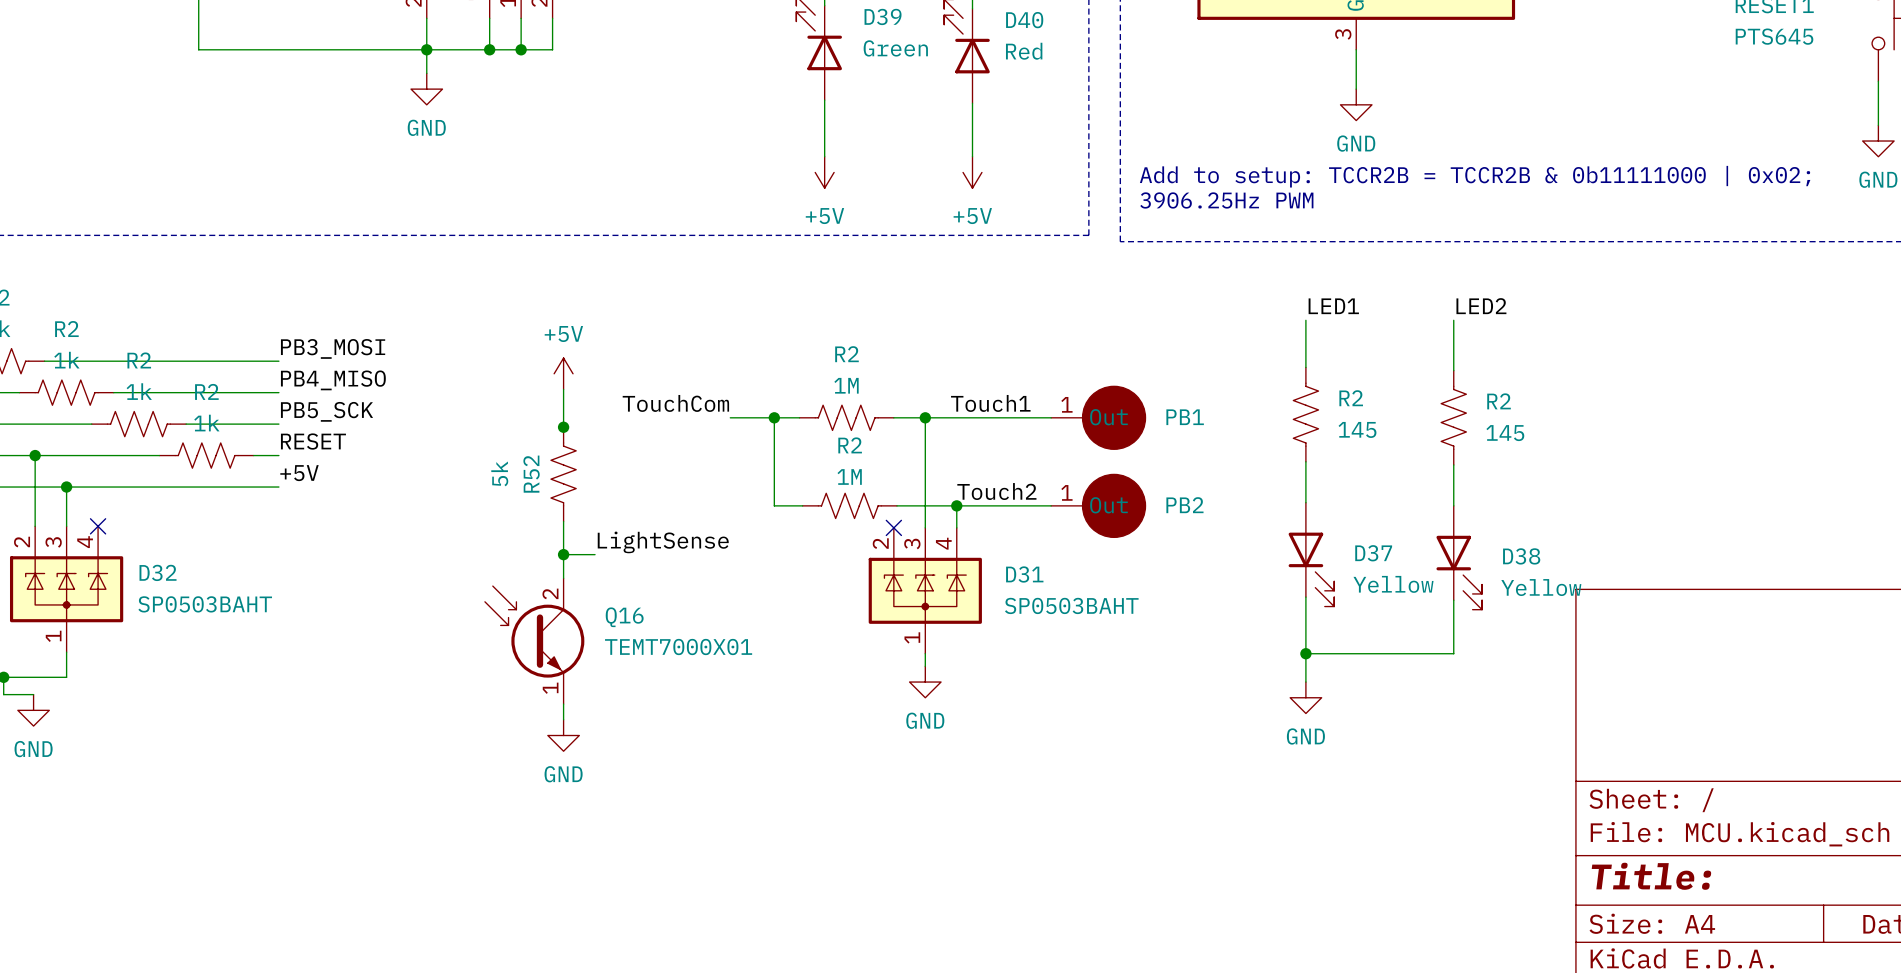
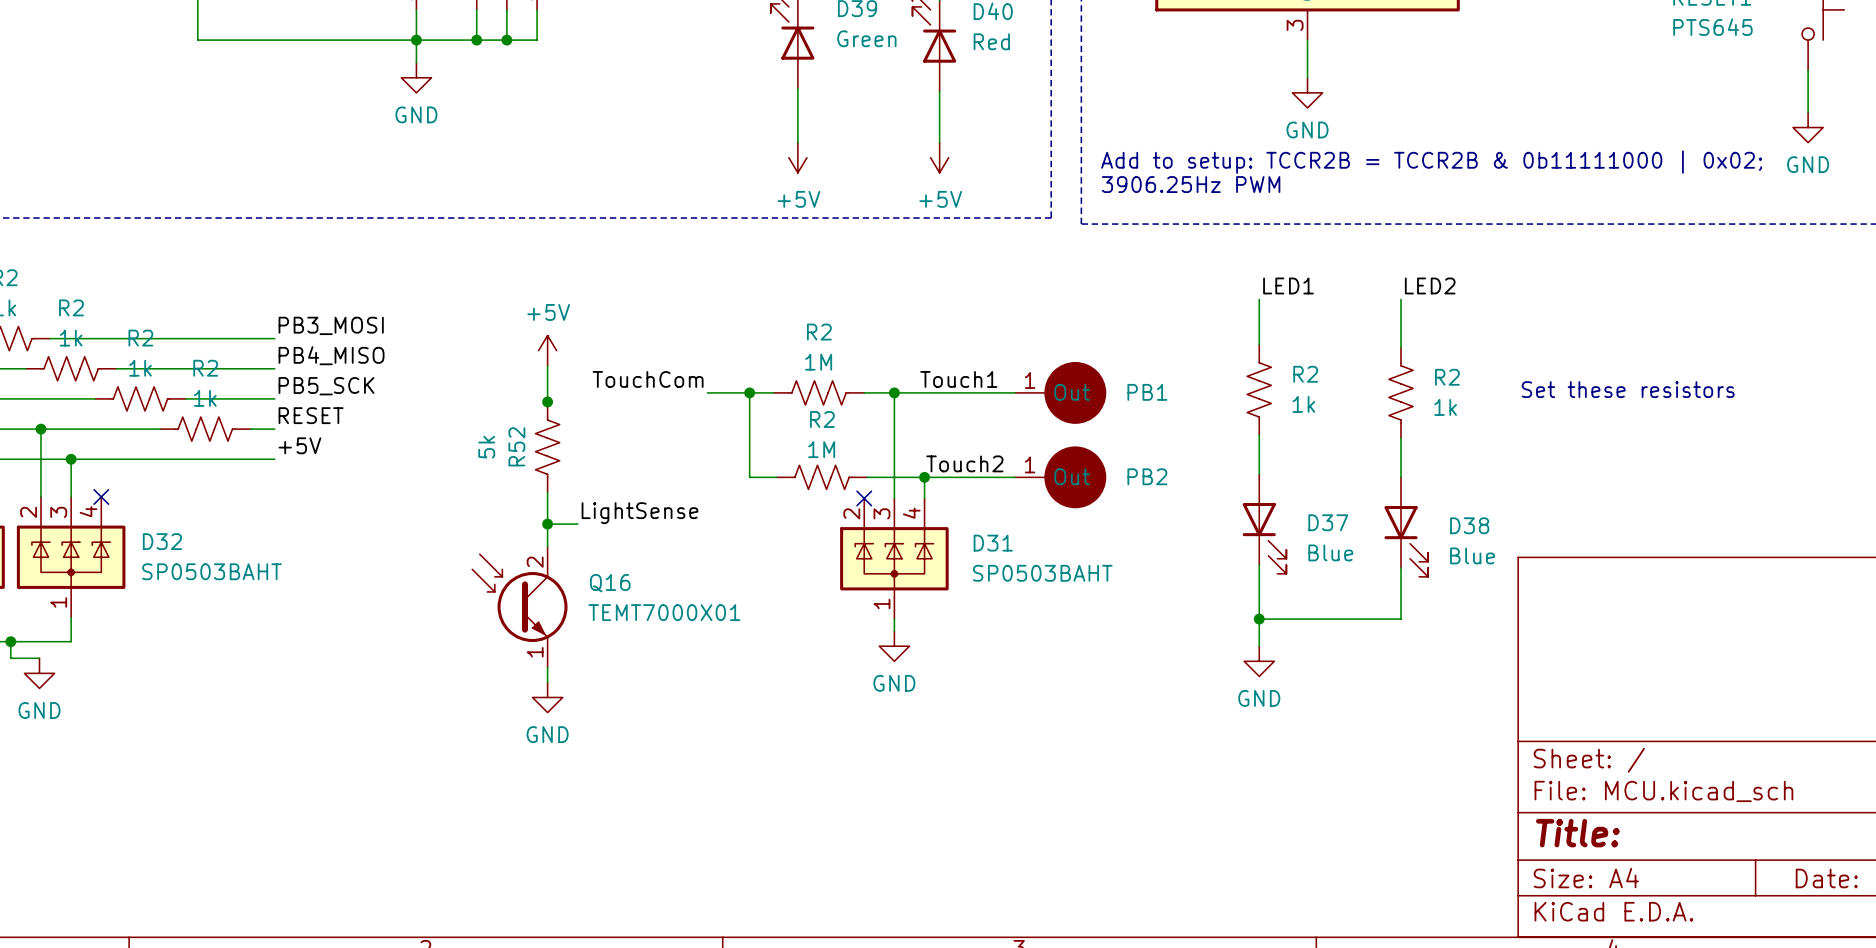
text: none -> Set these resistors (1628, 389)
R2 value: 145 (1357, 429) -> 1k (1303, 404)
R2 value: 145 (1505, 433) -> 1k (1445, 407)
D37 value: Yellow (1393, 584) -> Blue (1330, 552)
D38 value: Yellow (1541, 587) -> Blue (1472, 555)

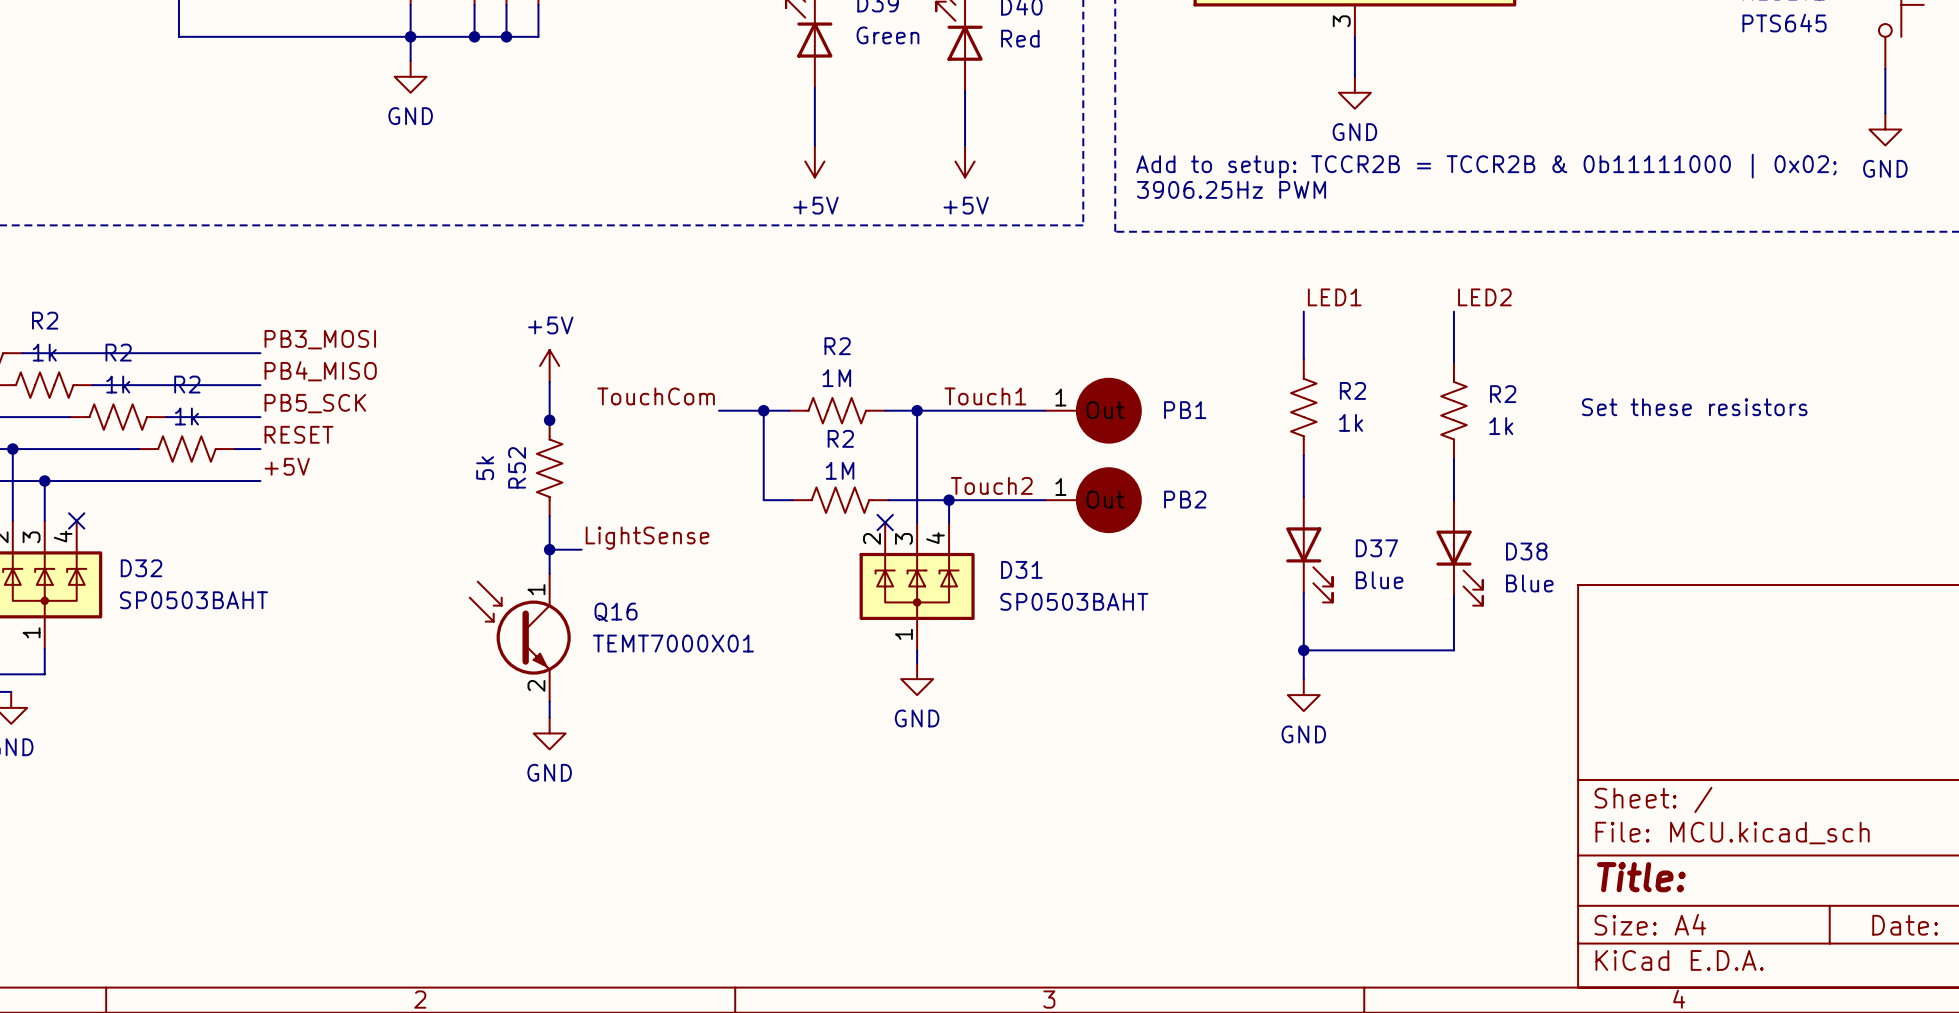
Q16 pin number: 2 (535, 562) -> 1 (536, 589)
Q16 pin number: 1 (535, 652) -> 2 (536, 685)

